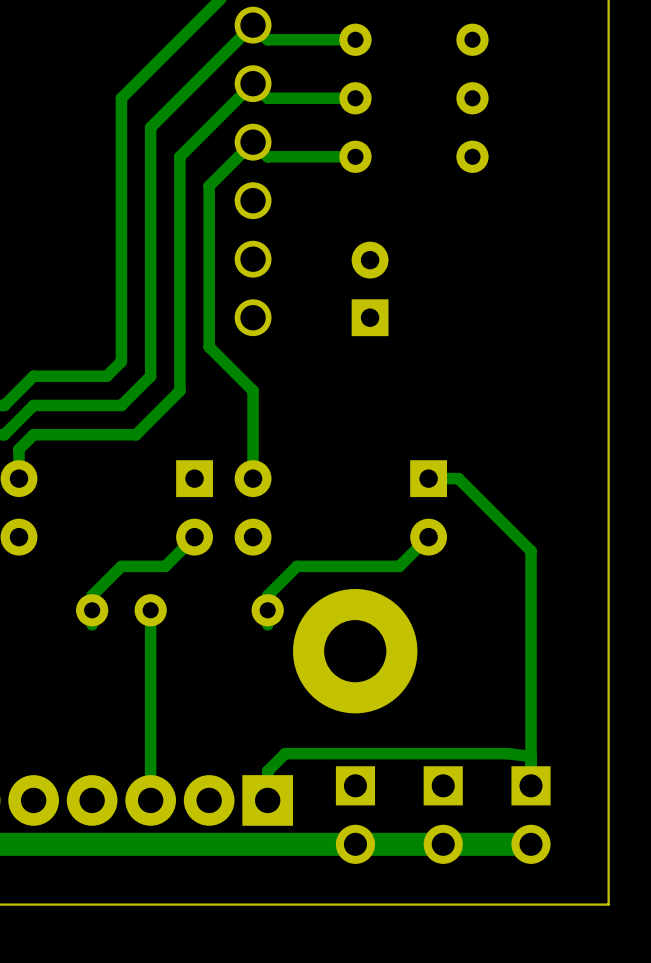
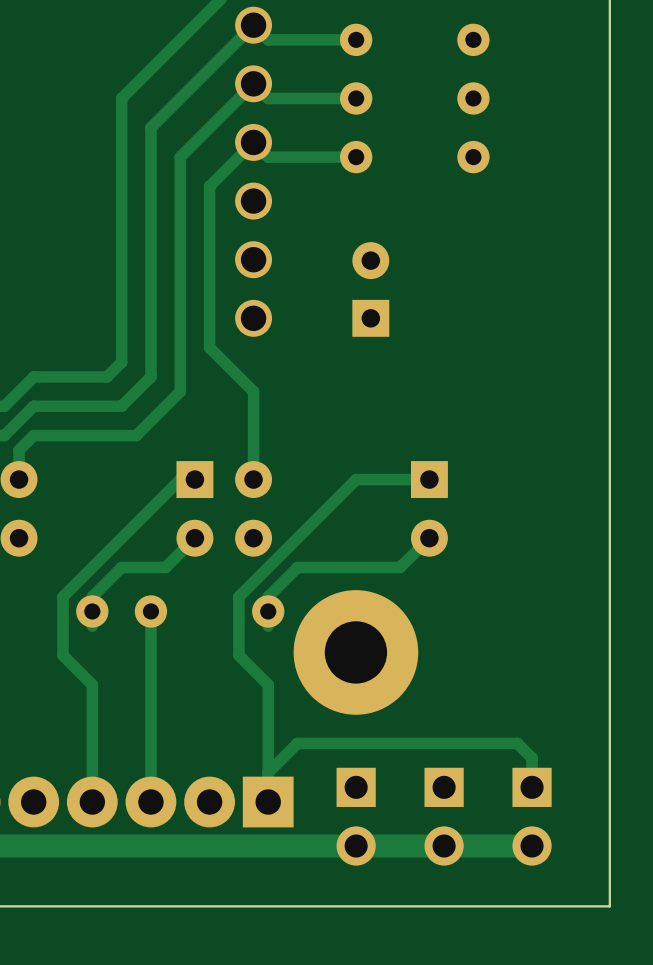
track: none -> (194, 479) (180, 479) (63, 596) (63, 655) (92, 684) (92, 787) (105, 800)
track: (428, 478) (458, 478) (531, 551) (531, 756) (507, 753) (285, 753) -> (429, 479) (356, 479) (238, 596) (238, 655) (268, 684) (268, 772)
track: none -> (285, 755) (297, 743) (517, 743) (532, 758)

